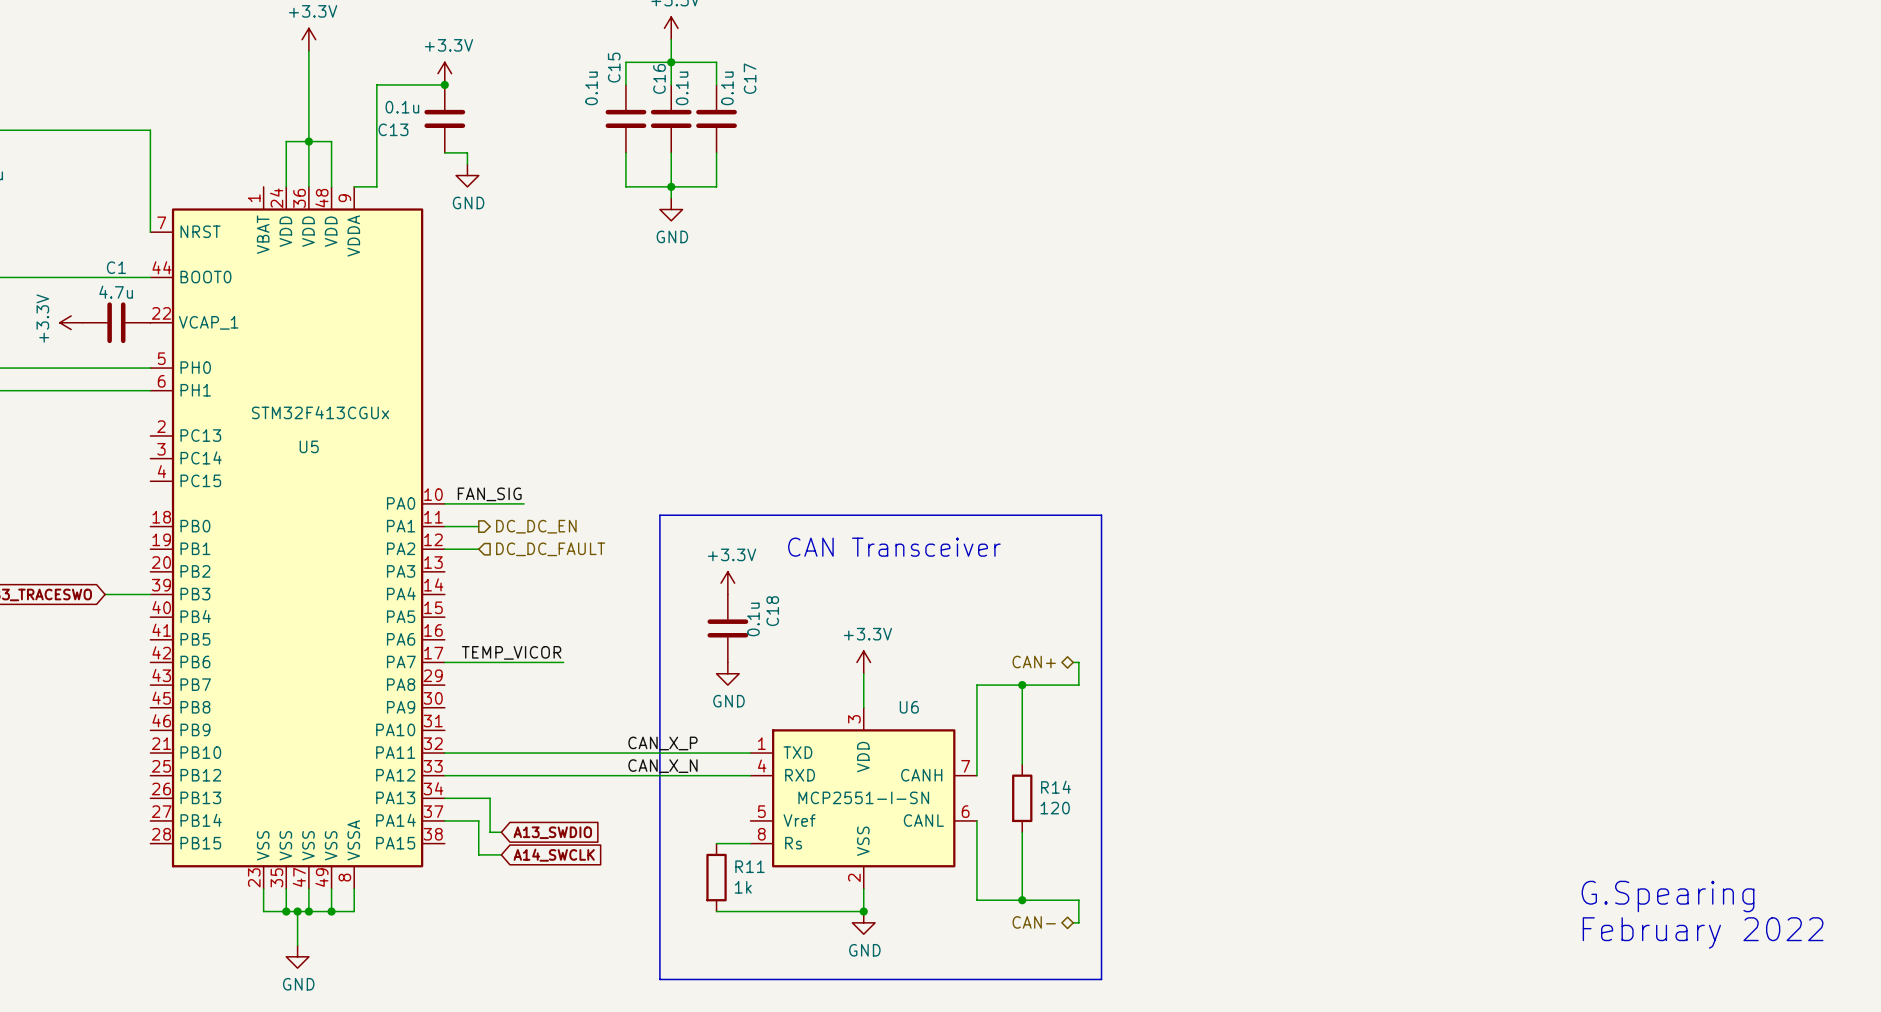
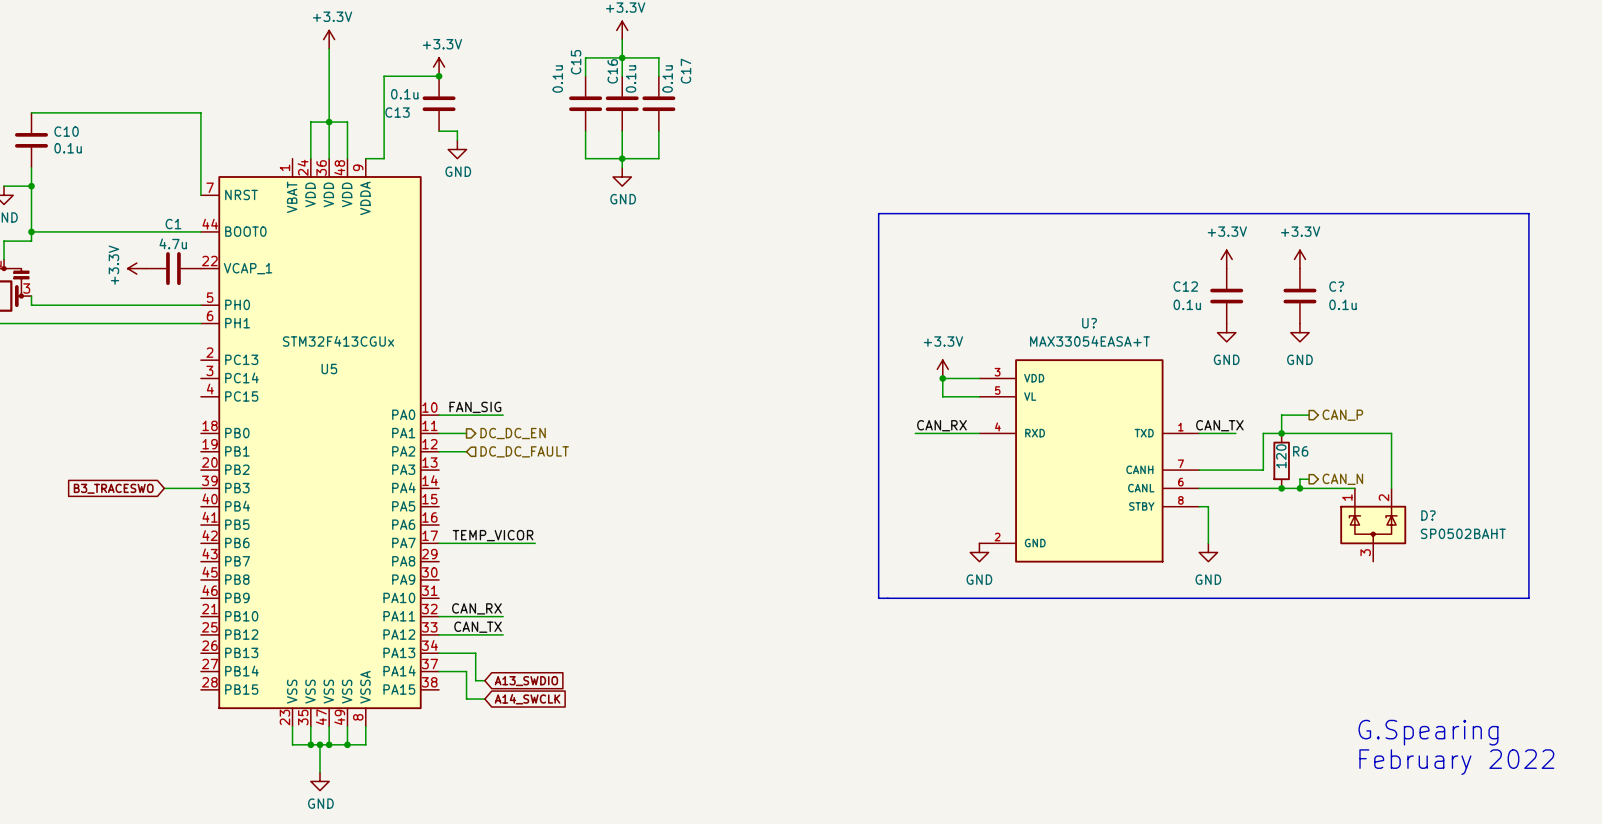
line: none -> (878, 213) (878, 598) (1528, 598) (1528, 213) (878, 213)
power symbol: none -> +3.3V (1226, 259)
power symbol: none -> +3.3V (1299, 259)
C12: none -> 0.1u (1226, 296)
C?: none -> 0.1u (1299, 296)
power symbol: none -> GND (1226, 332)
power symbol: none -> GND (1299, 332)
power symbol: none -> +3.3V (942, 369)
junction: none -> (942, 378)
wire: none -> (979, 378) (942, 378) (942, 396) (979, 396)
wire: none -> (1309, 415) (1281, 415) (1281, 433)
hierarchical label: none -> CAN_P (1342, 415)
line: (659, 515) (659, 979) (1101, 979) (1101, 515) (659, 515) -> none
label: none -> CAN_RX (941, 425)
label: none -> CAN_TX (1219, 425)
wire: none -> (915, 433) (979, 433)
wire: none -> (1199, 433) (1235, 433)
junction: none -> (1281, 433)
text: CAN Transceiver (894, 547) -> none
U?: none -> MAX33054EASA+T (1089, 460)
R6: none -> 120 (1281, 460)
wire: none -> (1199, 470) (1263, 470) (1263, 433) (1391, 433) (1391, 488)
power symbol: +3.3V (727, 583) -> none
wire: none -> (1309, 479) (1299, 479) (1299, 488)
hierarchical label: none -> CAN_N (1342, 479)
wire: none -> (1199, 488) (1354, 488)
junction: none -> (1281, 488)
junction: none -> (1299, 488)
wire: none -> (1199, 506) (1208, 506) (1208, 543)
C18: 0.1u (727, 628) -> none
D?: none -> SP0502BAHT (1373, 525)
power symbol: +3.3V (863, 662) -> none
hierarchical label: CAN+ (1034, 662) -> none
wire: (1073, 662) (1078, 662) (1078, 685) (976, 685) (976, 775) -> none
power symbol: GND (727, 673) -> none
wire: (863, 673) (863, 707) -> none
power symbol: none -> GND (979, 552)
power symbol: none -> GND (1208, 552)
wire: (1022, 685) (1022, 764) -> none
junction: (1022, 685) -> none
label: none -> CAN_RX (476, 608)
label: CAN_X_P (662, 743) -> none
wire: (524, 753) (750, 753) -> none
label: none -> CAN_TX (478, 627)
label: CAN_X_N (662, 766) -> none
wire: (524, 775) (750, 775) -> none
U6: MCP2551-I-SN (863, 798) -> none
R14: 120 (1022, 798) -> none
wire: (976, 820) (976, 900) (1078, 900) (1078, 922) (1073, 922) -> none
wire: (1022, 832) (1022, 900) -> none
wire: (716, 843) (750, 843) -> none
R11: 1k (716, 877) -> none
wire: (863, 888) (863, 911) (716, 911) -> none
junction: (1022, 900) -> none
junction: (863, 911) -> none
power symbol: GND (863, 922) -> none
hierarchical label: CAN- (1034, 922) -> none

